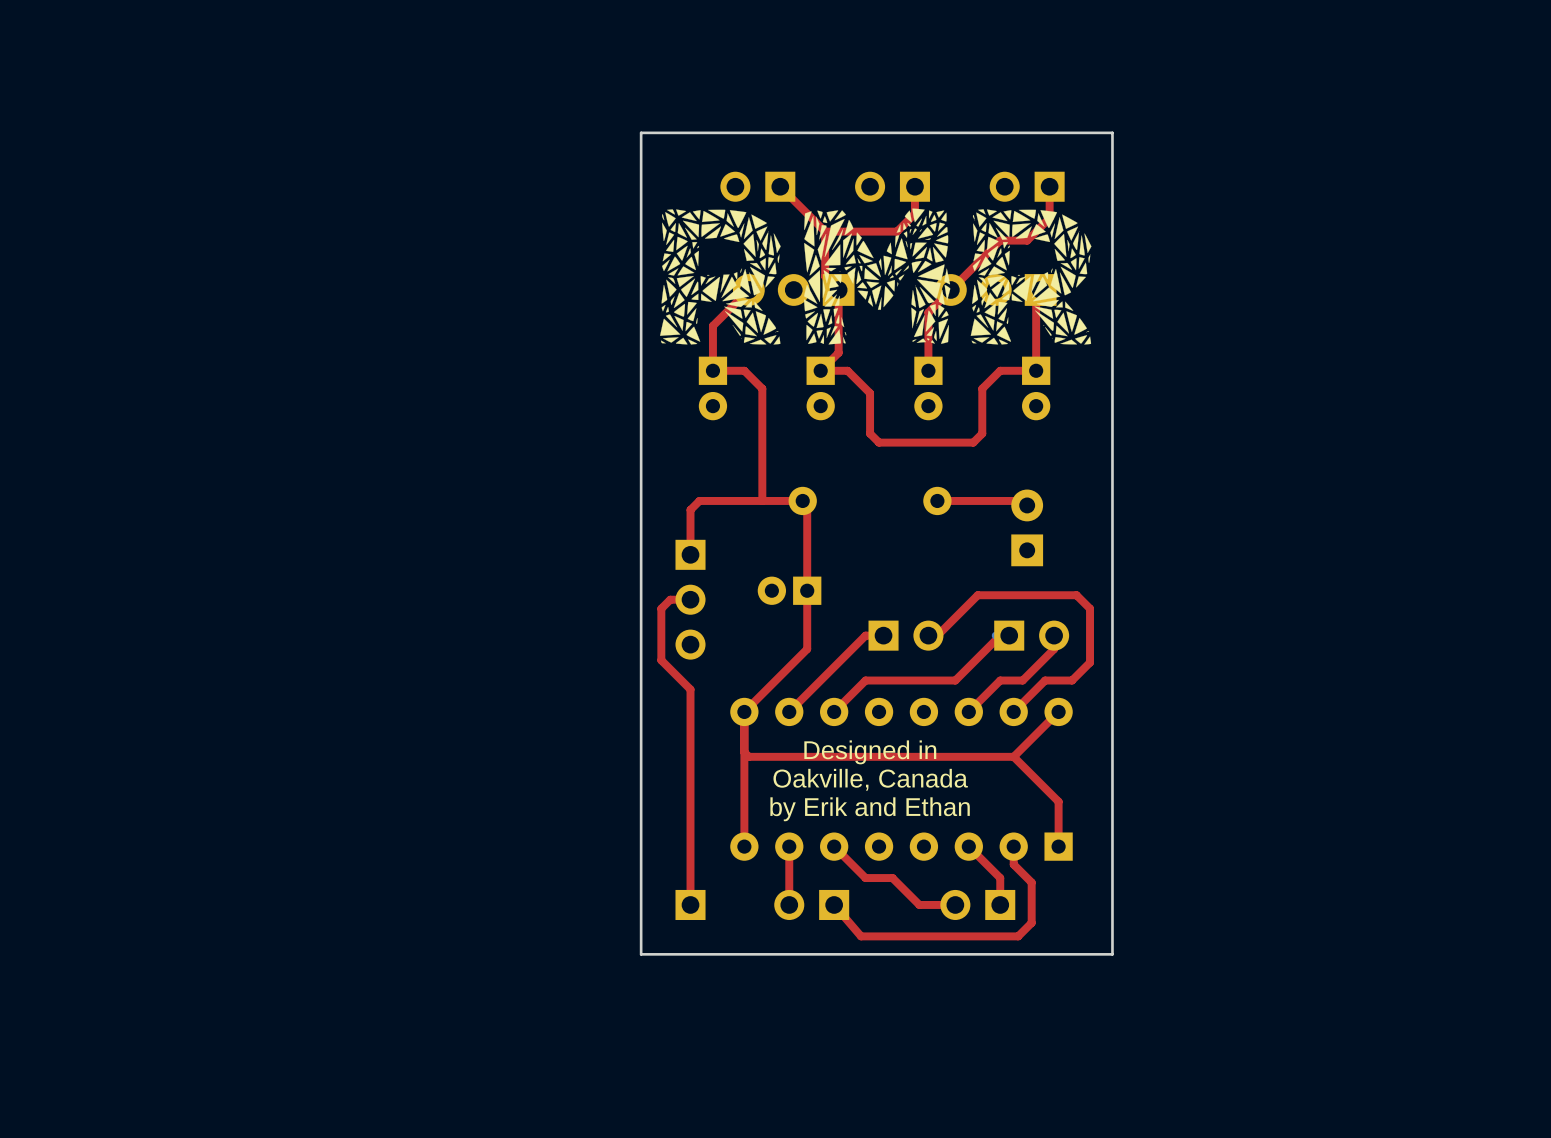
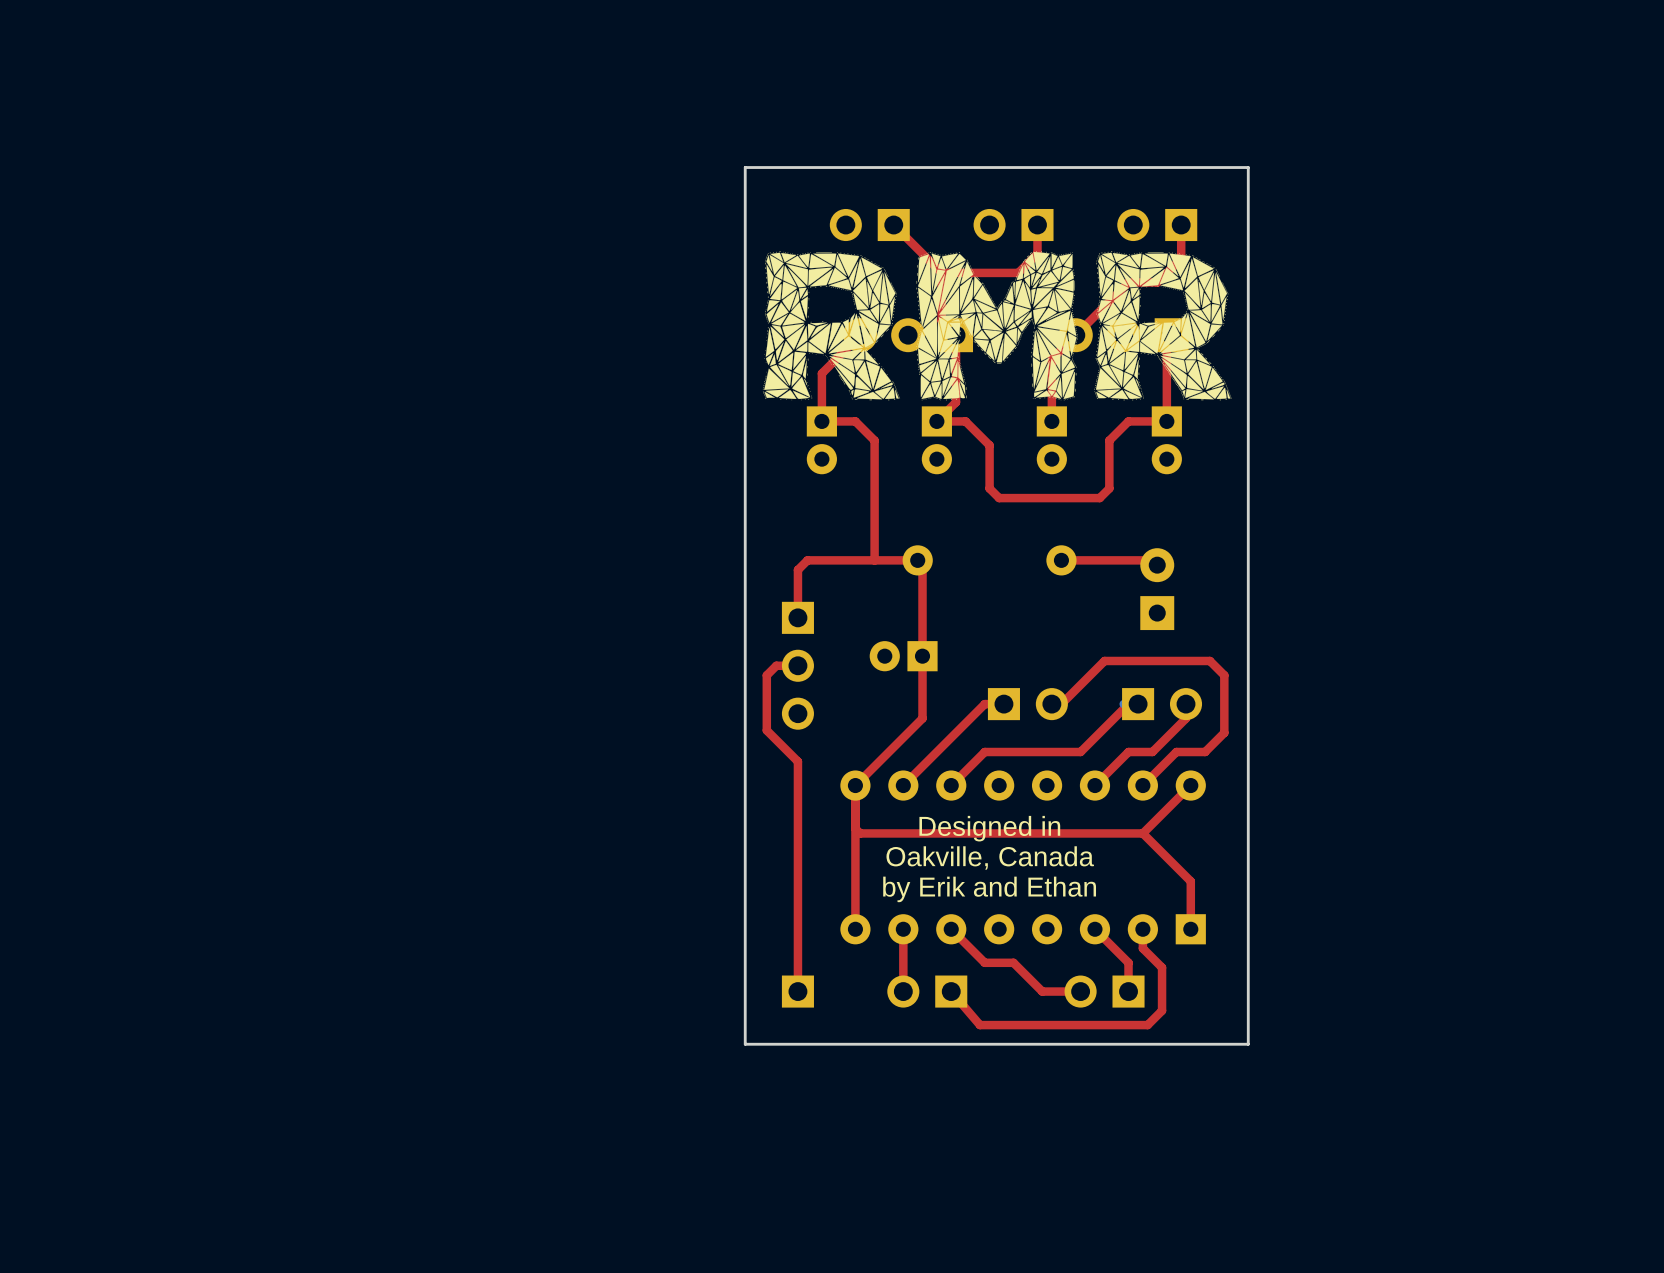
drawing shape: [660, 208, 1092, 345] -> [762, 251, 1232, 401]

